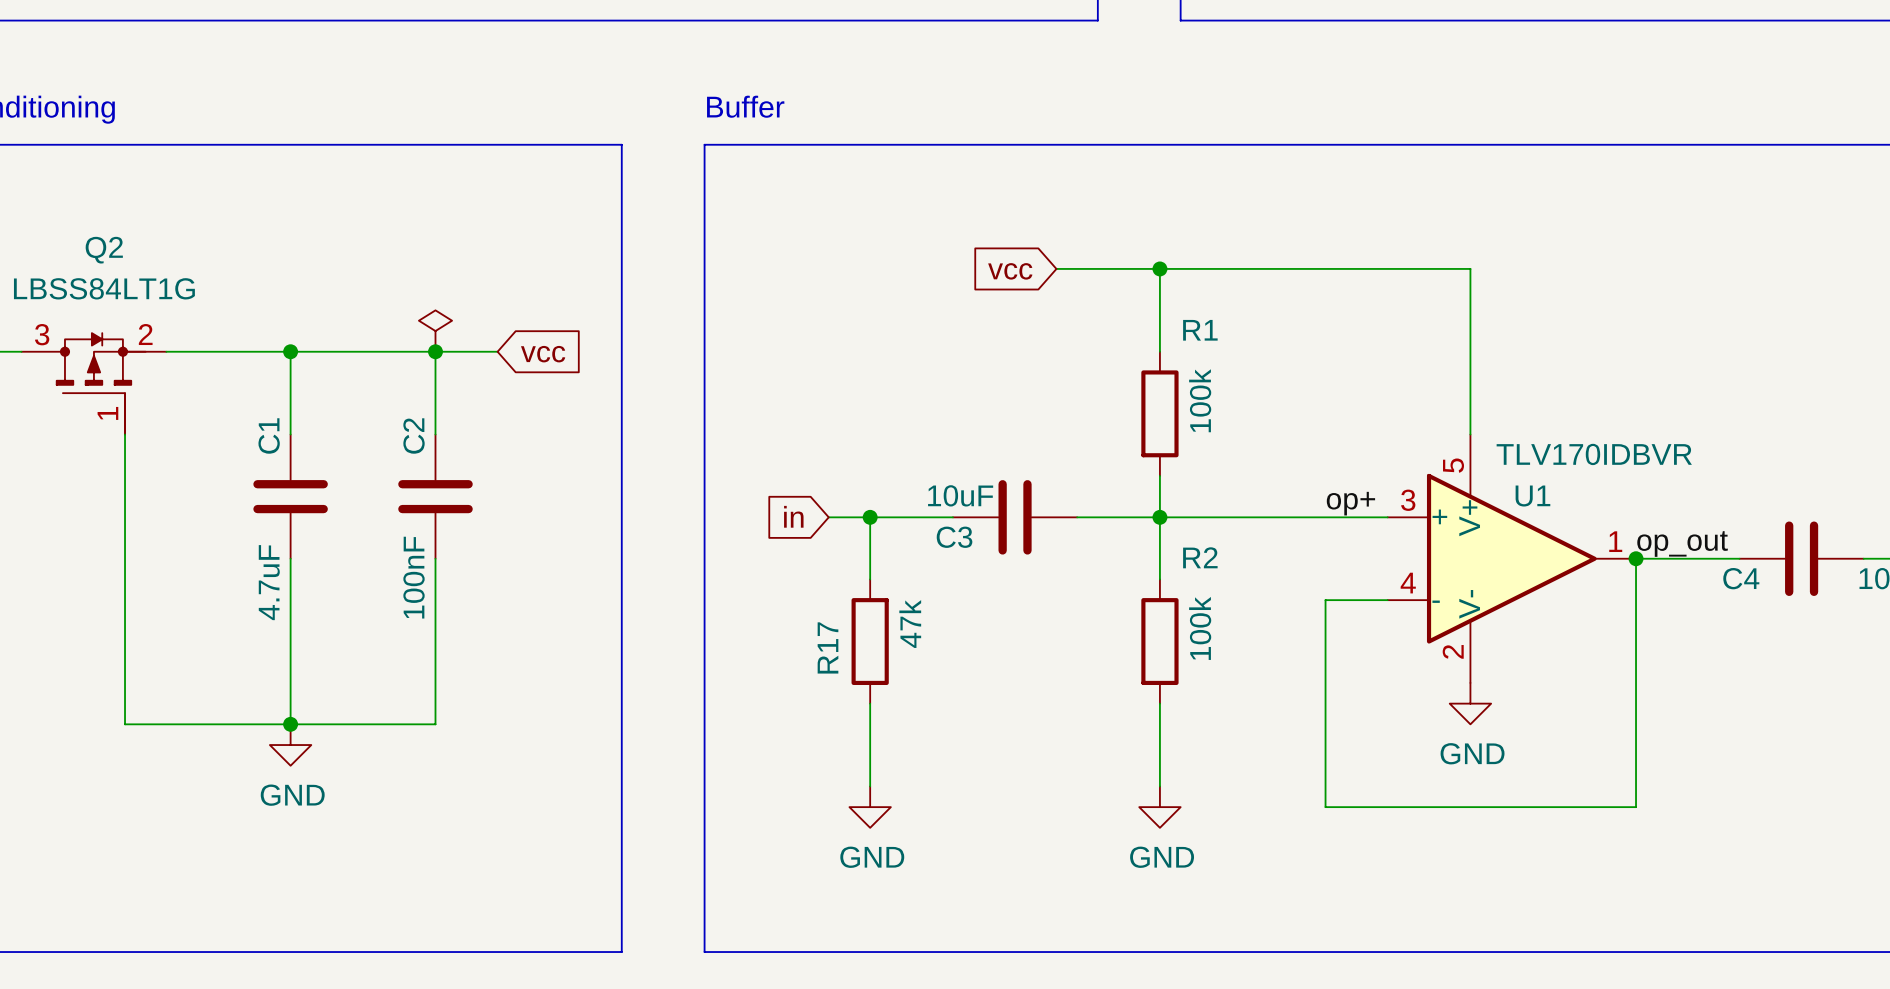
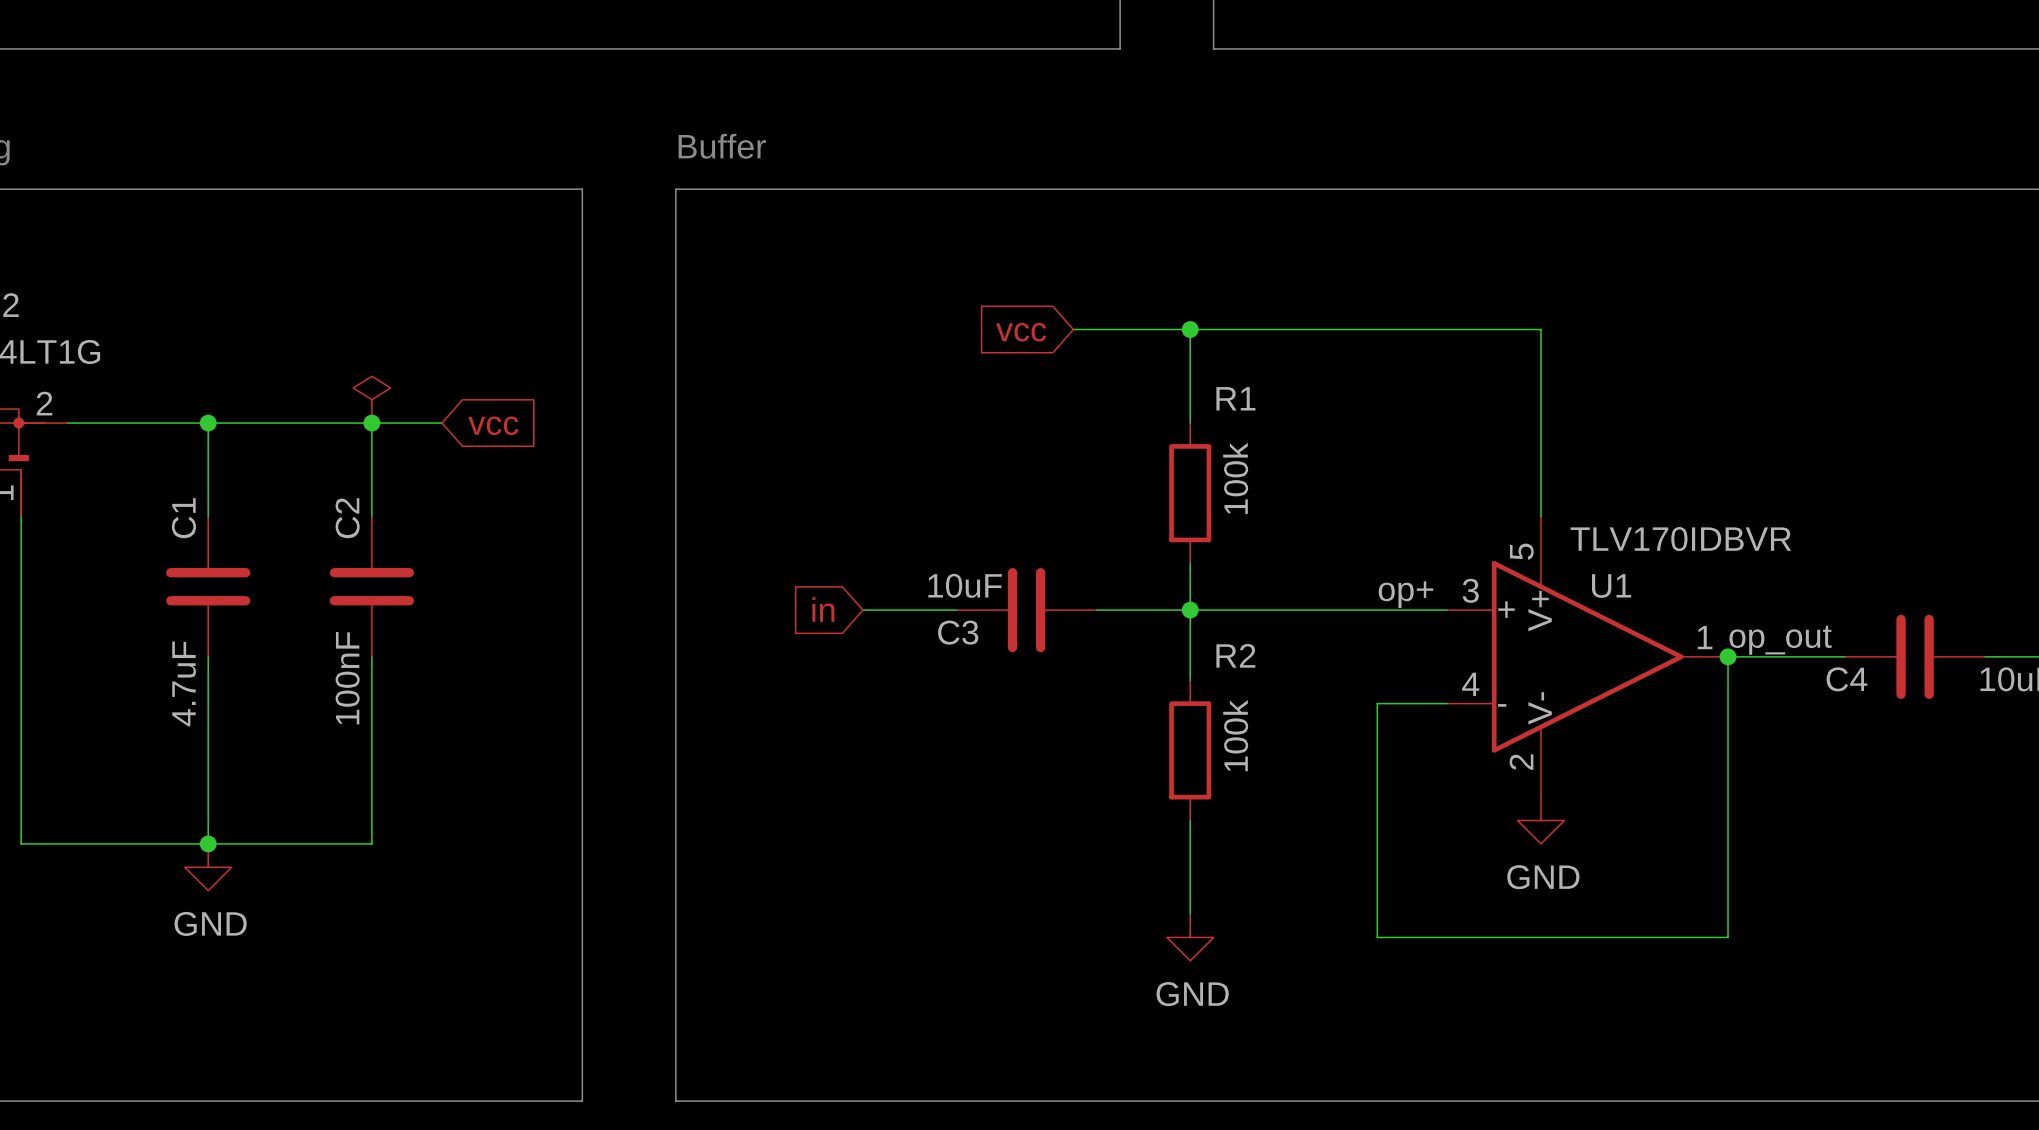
global label position: in (793, 516) -> in (823, 609)
wire: (828, 517) (870, 517) (870, 579) -> none
junction: (870, 517) -> none
R17: 47k (870, 641) -> none
wire: (870, 703) (870, 786) -> none
power symbol: GND (870, 807) -> none

